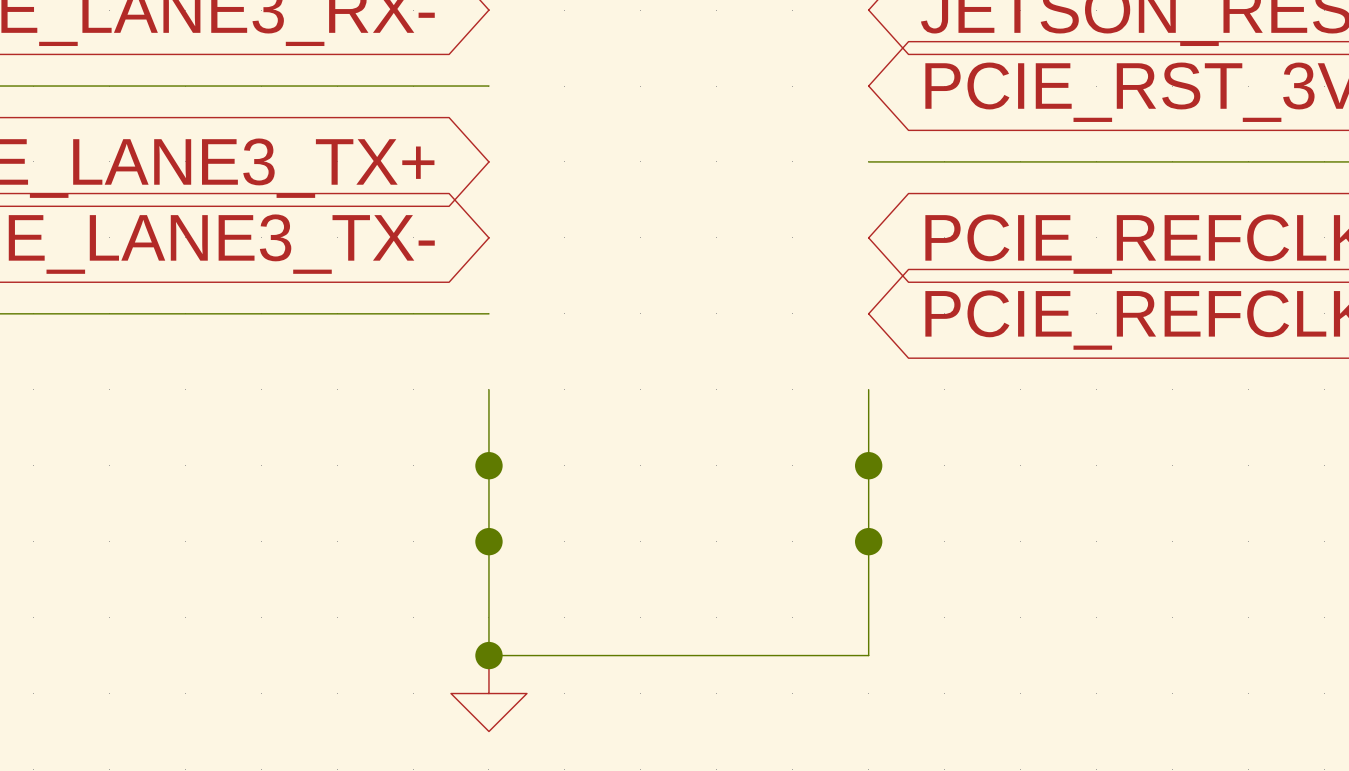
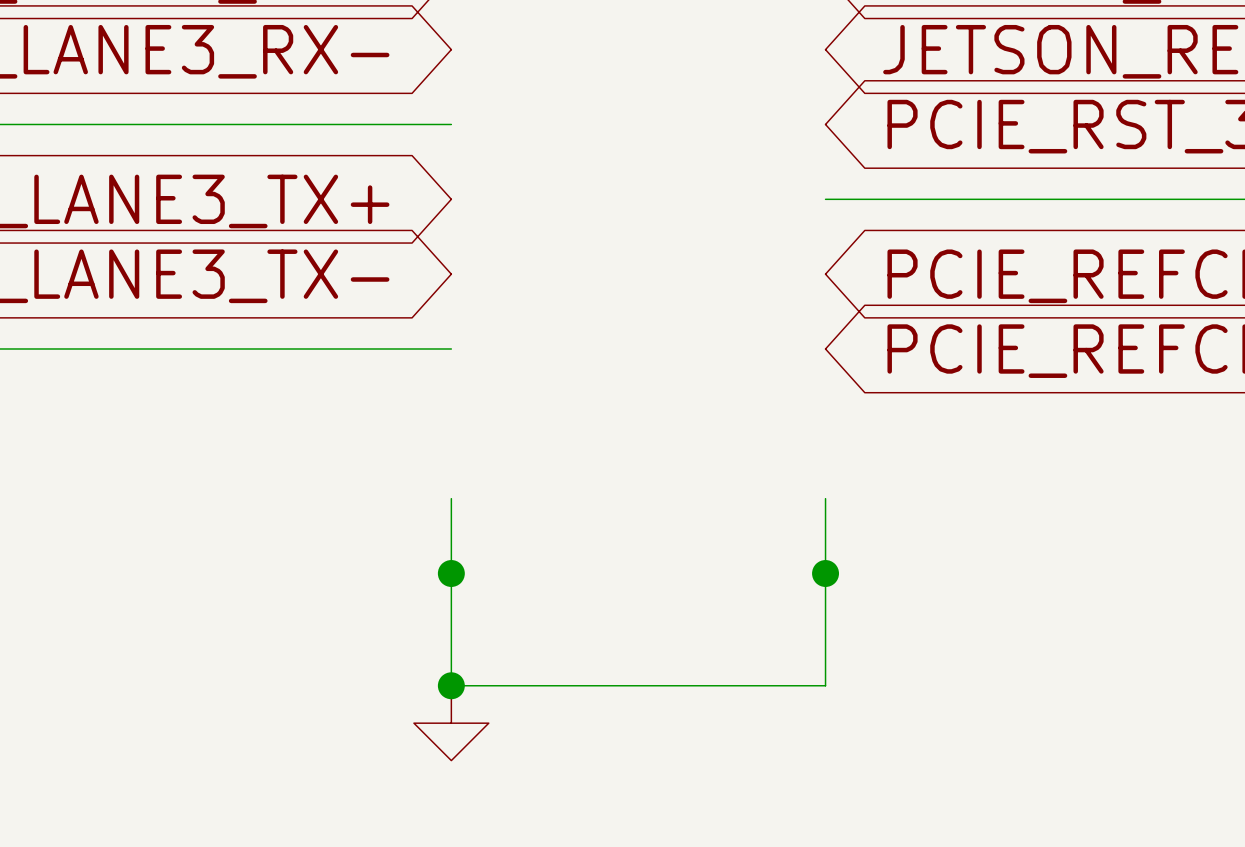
wire: (488, 389) (488, 465) -> none
wire: (868, 389) (868, 465) -> none
junction: (488, 465) -> none
junction: (868, 465) -> none

